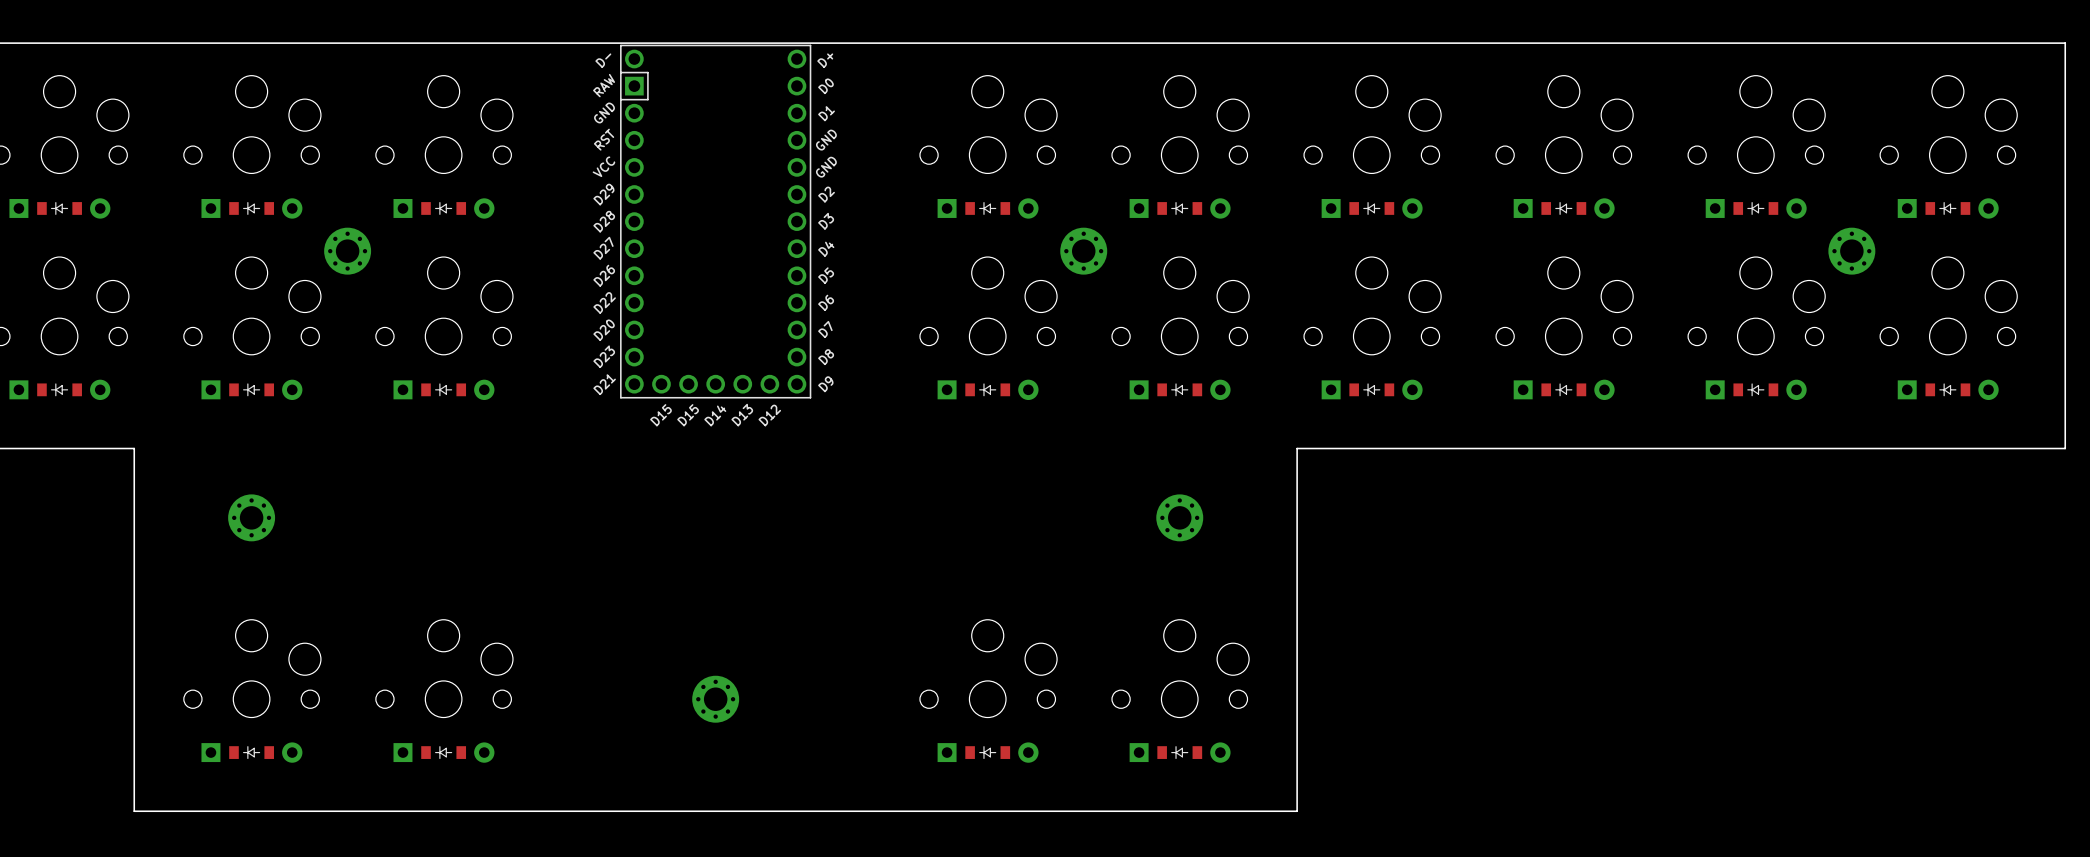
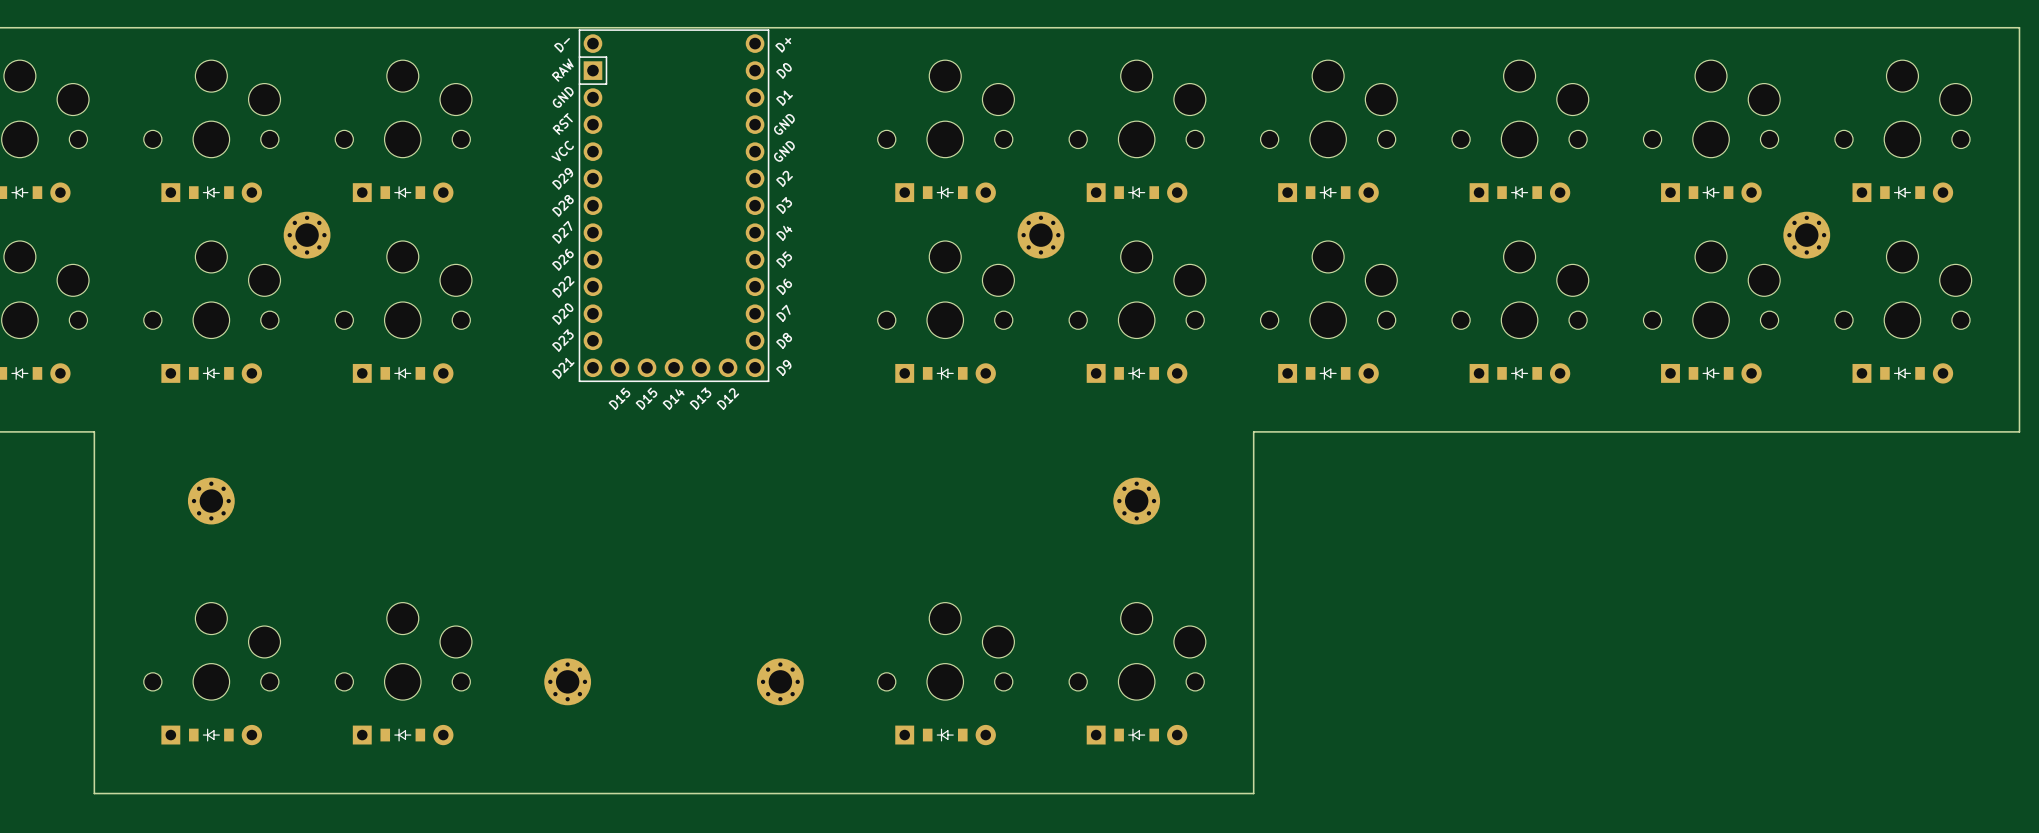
part: none -> (567, 681)
part: (715, 699) -> none
part: none -> (780, 681)

